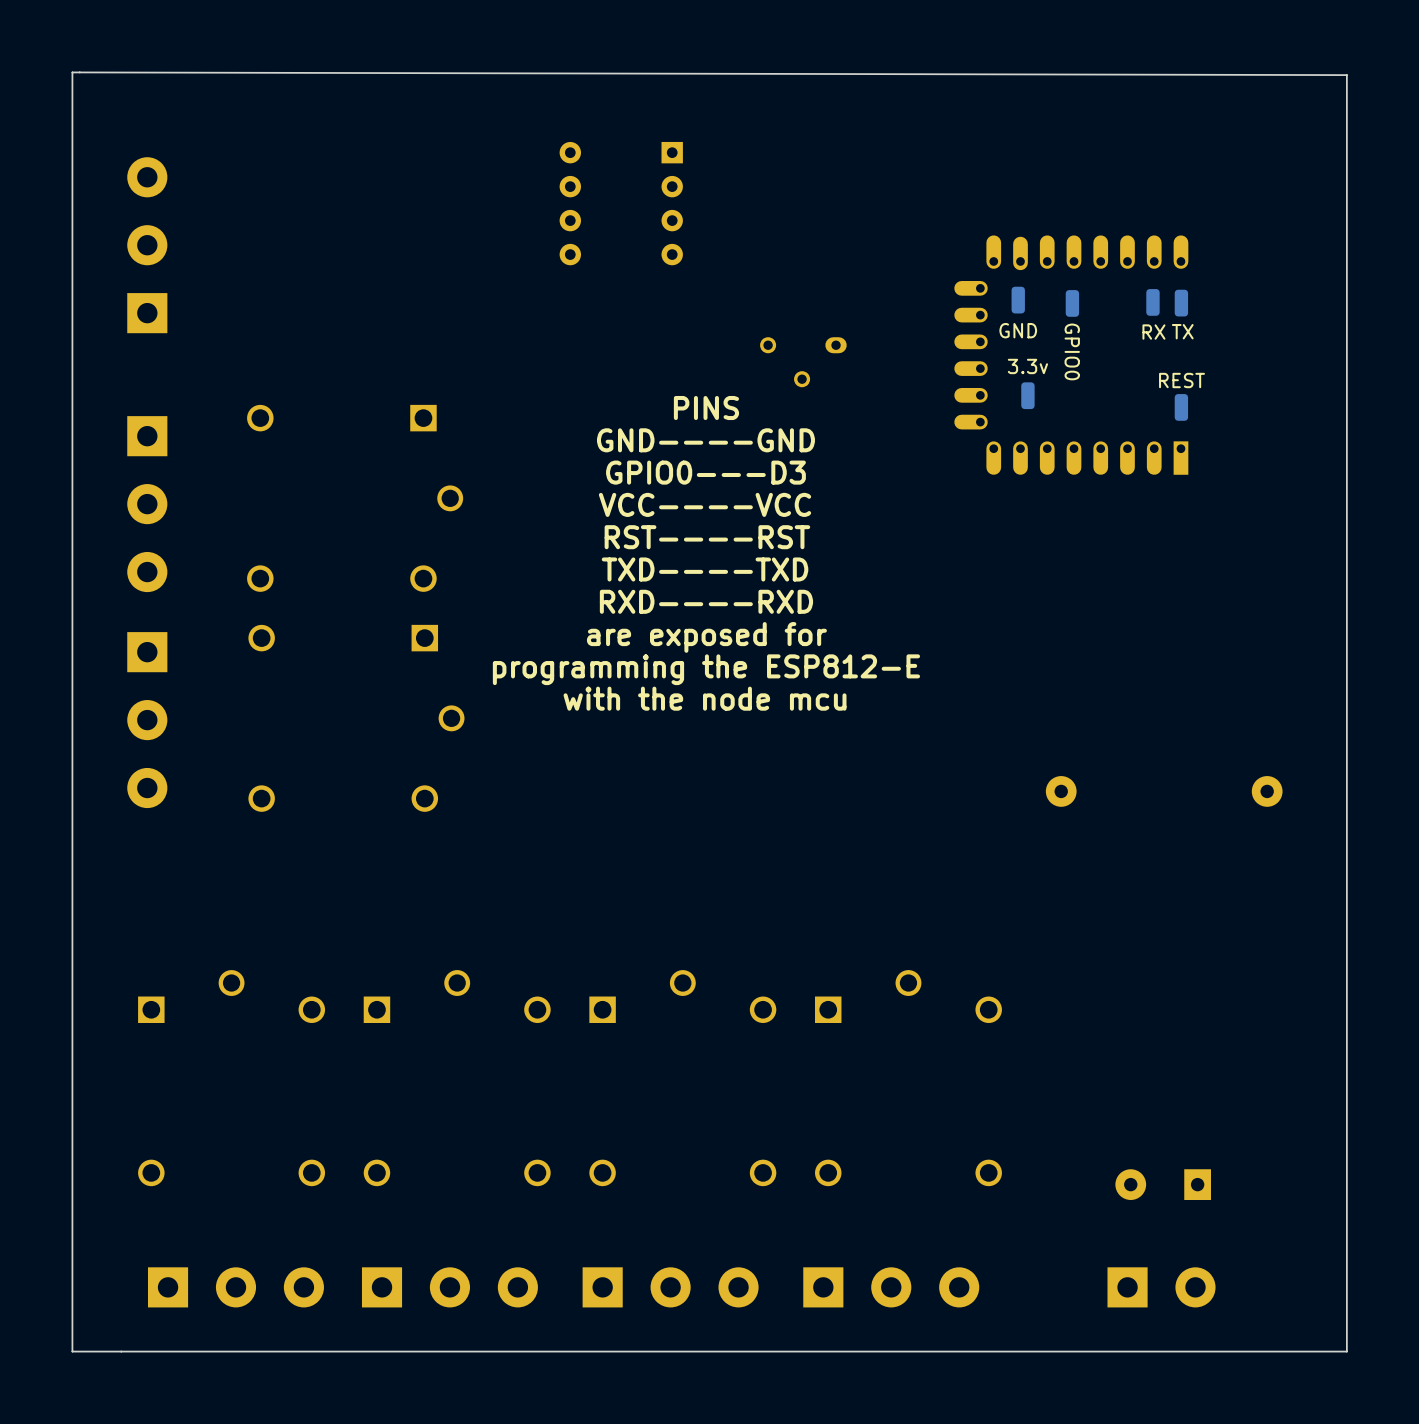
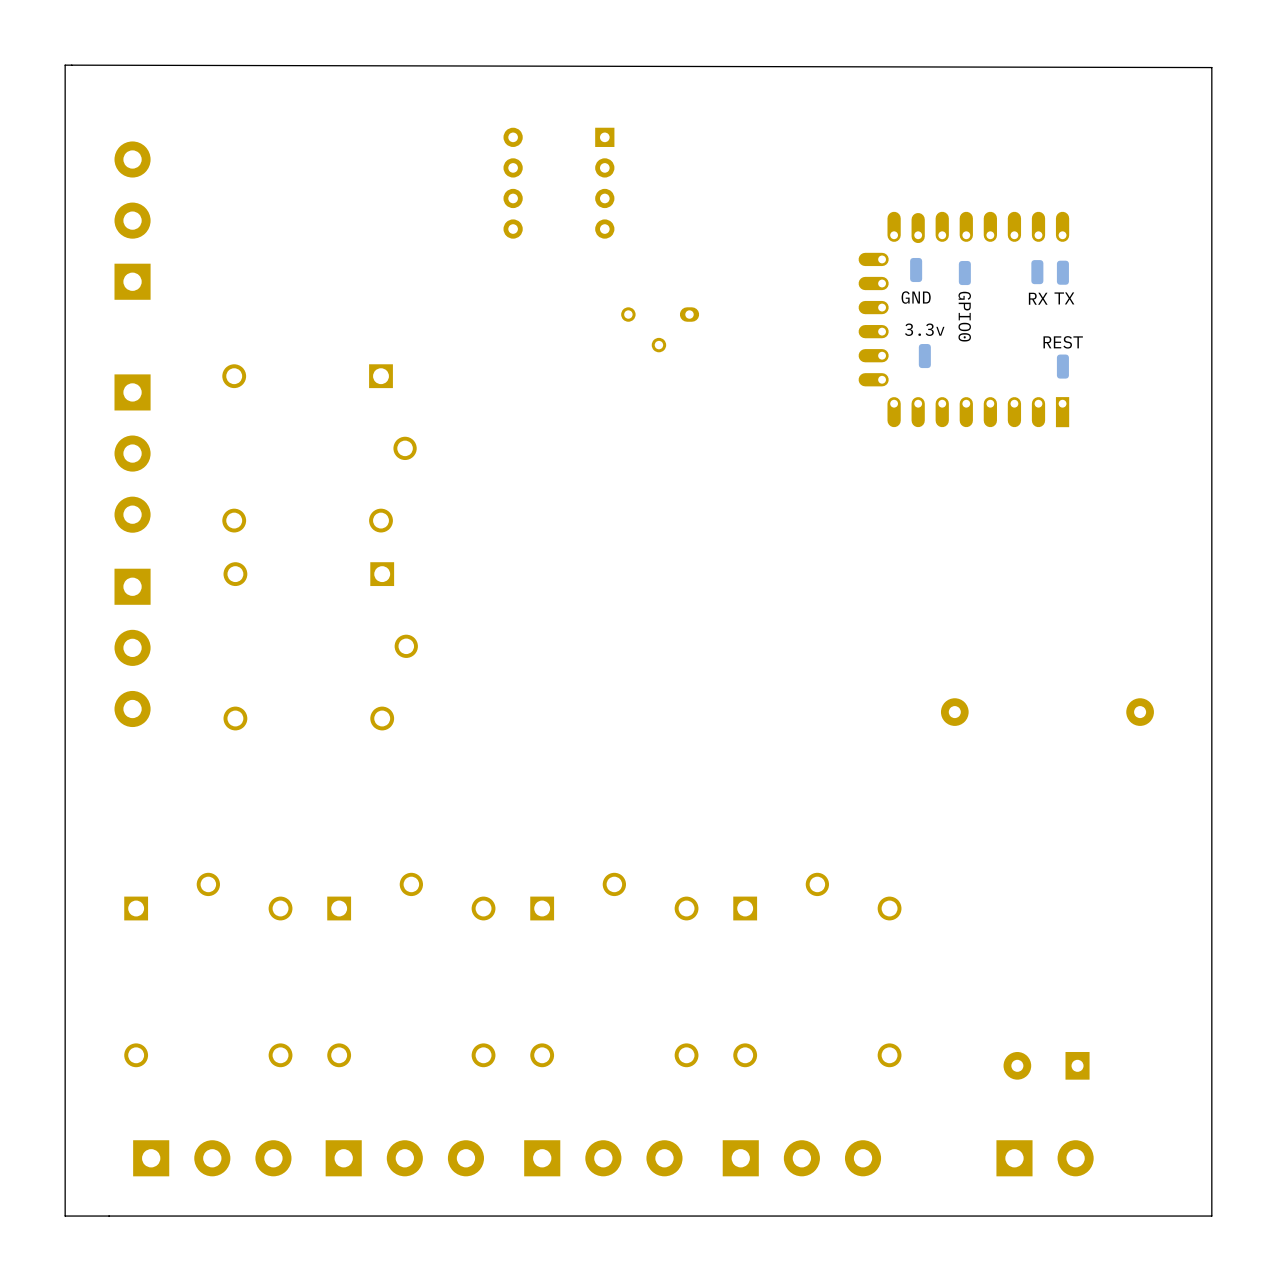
part position: (803, 362) -> (660, 329)
text: PINS (706, 408) -> none
text: GND----GND (705, 440) -> none
text: GPIO0---D3 (705, 472) -> none
text: VCC----VCC (705, 504) -> none
text: RST----RST (707, 537) -> none
text: TXD----TXD (705, 569) -> none
text: RXD----RXD (706, 601) -> none
text: are exposed for (706, 637) -> none
text: programming the ESP812-E (706, 669) -> none
text: with the node mcu (705, 698) -> none

